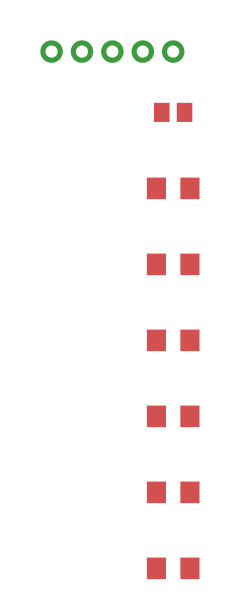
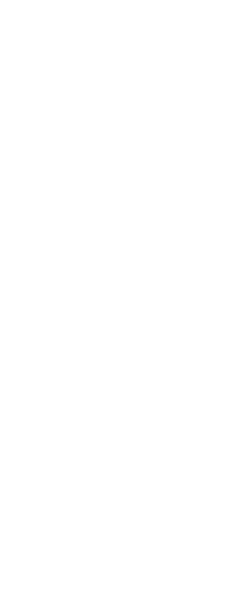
part: (112, 51) -> none
part: (173, 112) -> none
part: (173, 188) -> none
part: (173, 264) -> none
part: (173, 340) -> none
part: (173, 416) -> none
part: (173, 492) -> none
part: (173, 568) -> none

